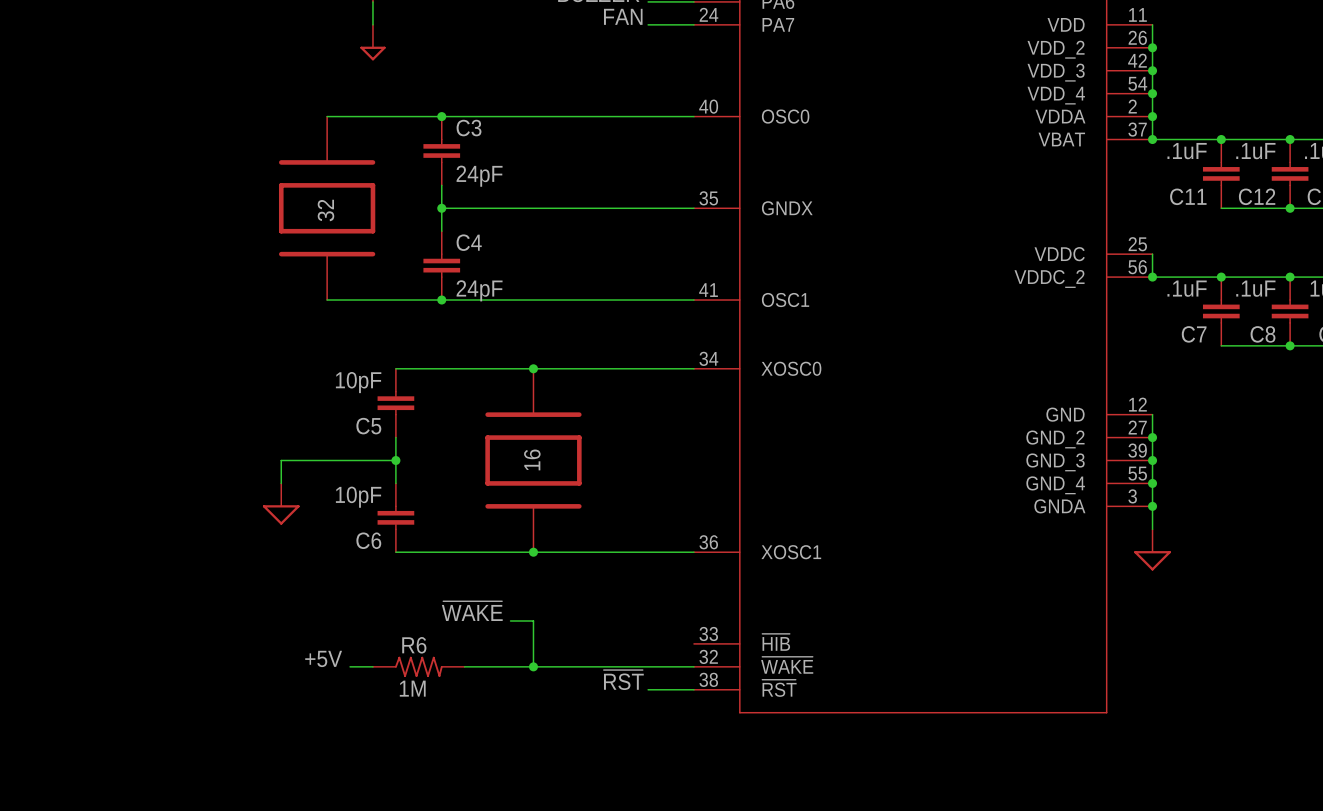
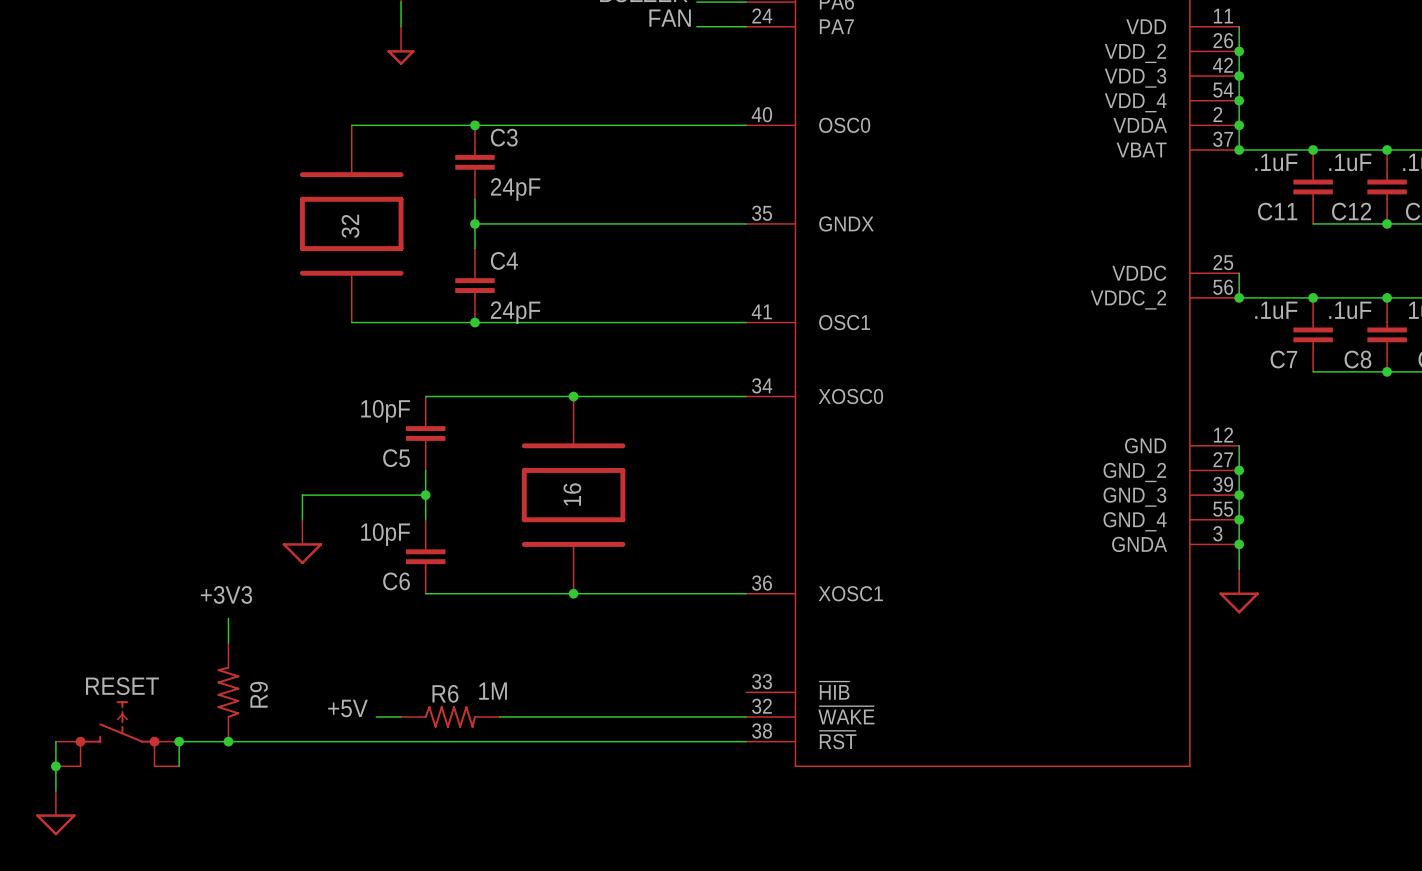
label: none -> +3V3 (226, 594)
wire: none -> (228, 618) (228, 643)
label: ~{WAKE} (472, 611) -> none
wire: (510, 620) (533, 620) (533, 666) -> none
R9: none -> (228, 692)
junction: (533, 666) -> none
label: ~{RST} (623, 680) -> none
RESET: none -> (117, 734)
R6 value position: 1M (412, 688) -> 1M (493, 691)
wire: none -> (55, 741) (55, 790)
junction: none -> (179, 741)
junction: none -> (228, 741)
wire: none -> (696, 741) (179, 741) (179, 766)
junction: none -> (55, 766)
power symbol: none -> (55, 813)

